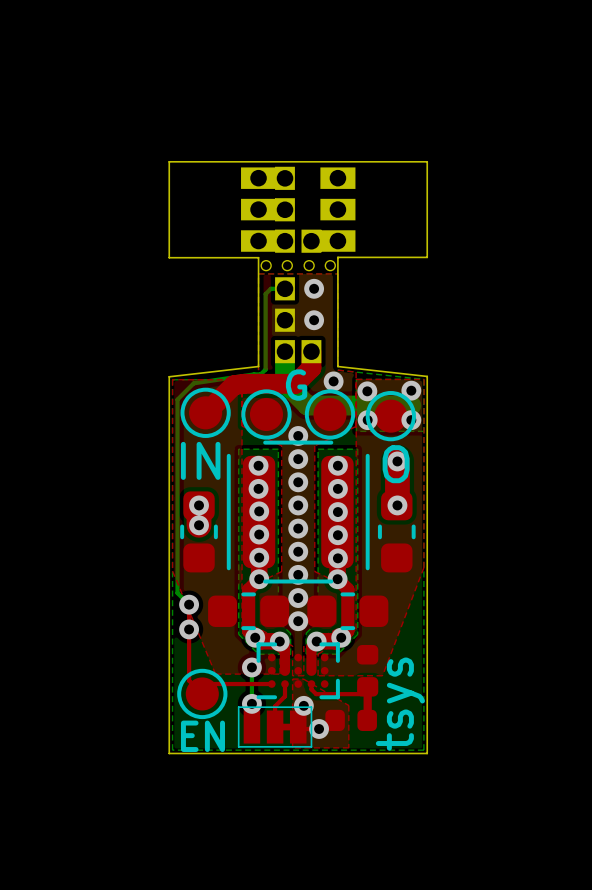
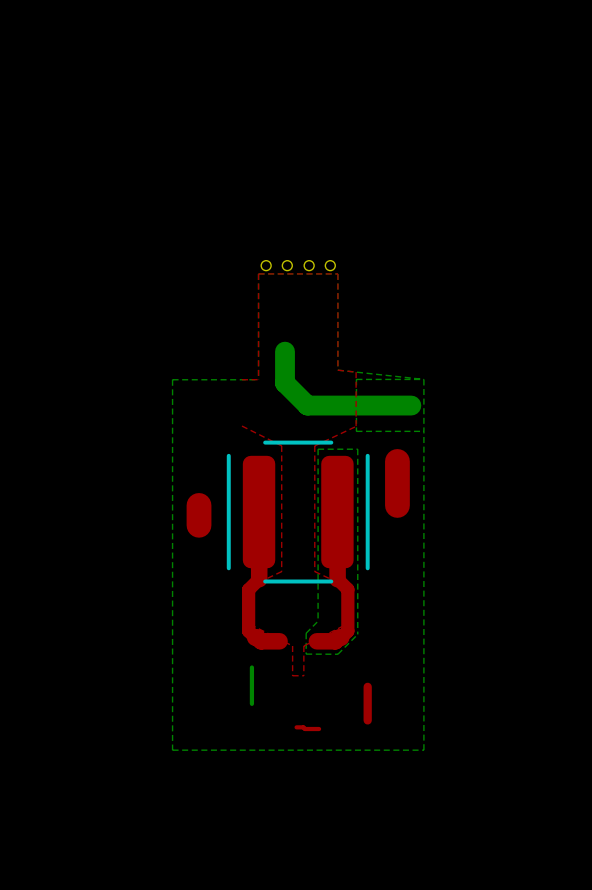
board edge: (169, 161) (427, 161) (427, 257) (337, 257) (337, 366) (427, 376) (427, 753) (169, 753) (169, 376) (258, 366) (258, 257) (169, 257) (169, 161) -> none
part: (285, 209) -> none
part: (298, 209) -> none
part: (311, 241) -> none
bottom track: (285, 288) (270, 288) (265, 294) (265, 369) (260, 374) (193, 383) (177, 399) (177, 593) (189, 604) (189, 629) -> none
via: (314, 288) -> none
part: (285, 320) -> none
via: (314, 320) -> none
top track: (311, 351) (311, 367) (295, 383) (233, 385) (205, 413) -> none
part: (311, 351) -> none
top zone outline: (172, 379) (242, 379) (242, 627) (280, 652) (280, 674) (215, 674) (172, 571) (172, 379) -> none
top zone outline: (356, 379) (356, 629) (318, 654) (318, 675) (382, 675) (423, 567) (424, 379) (356, 379) -> none
via: (333, 381) -> none
text: G (296, 385) -> none
via: (411, 390) -> none
via: (367, 391) -> none
part: (205, 412) -> none
part: (266, 414) -> none
part: (329, 414) -> none
part: (390, 416) -> none
via: (367, 420) -> none
via: (411, 420) -> none
via: (298, 435) -> none
bottom zone outline: (238, 449) (278, 449) (278, 621) (290, 633) (290, 654) (258, 654) (238, 634) (238, 449) -> none
via: (298, 459) -> none
text: IN (200, 460) -> none
via: (397, 461) -> none
text: O (396, 464) -> none
via: (258, 465) -> none
via: (337, 465) -> none
via: (298, 482) -> none
via: (258, 488) -> none
via: (337, 488) -> none
via: (199, 505) -> none
via: (298, 505) -> none
via: (397, 505) -> none
via: (259, 511) -> none
via: (337, 512) -> none
via: (199, 525) -> none
via: (298, 528) -> none
part: (199, 531) -> none
part: (396, 531) -> none
via: (259, 534) -> none
via: (337, 535) -> none
via: (298, 551) -> none
via: (259, 557) -> none
via: (337, 558) -> none
via: (298, 574) -> none
via: (259, 579) -> none
via: (337, 579) -> none
via: (298, 598) -> none
top track: (189, 604) (189, 680) (200, 692) -> none
via: (189, 604) -> none
part: (248, 611) -> none
part: (347, 611) -> none
via: (298, 621) -> none
via: (189, 629) -> none
via: (255, 637) -> none
via: (341, 637) -> none
top track: (278, 641) (285, 646) (285, 670) -> none
via: (279, 641) -> none
via: (316, 641) -> none
top track: (317, 641) (311, 646) (311, 670) -> none
via: (251, 667) -> none
part: (298, 670) -> none
part: (367, 670) -> none
top zone outline: (292, 679) (292, 747) (348, 747) (348, 705) (303, 679) (292, 679) -> none
top track: (271, 684) (212, 684) (202, 693) -> none
top track: (285, 684) (285, 696) (275, 706) (275, 727) -> none
top track: (311, 684) (311, 689) (316, 694) (360, 694) -> none
part: (202, 693) -> none
via: (251, 703) -> none
text: tsys (400, 704) -> none
via: (303, 705) -> none
part: (351, 720) -> none
part: (275, 727) -> none
via: (319, 729) -> none
text: EN (202, 736) -> none

